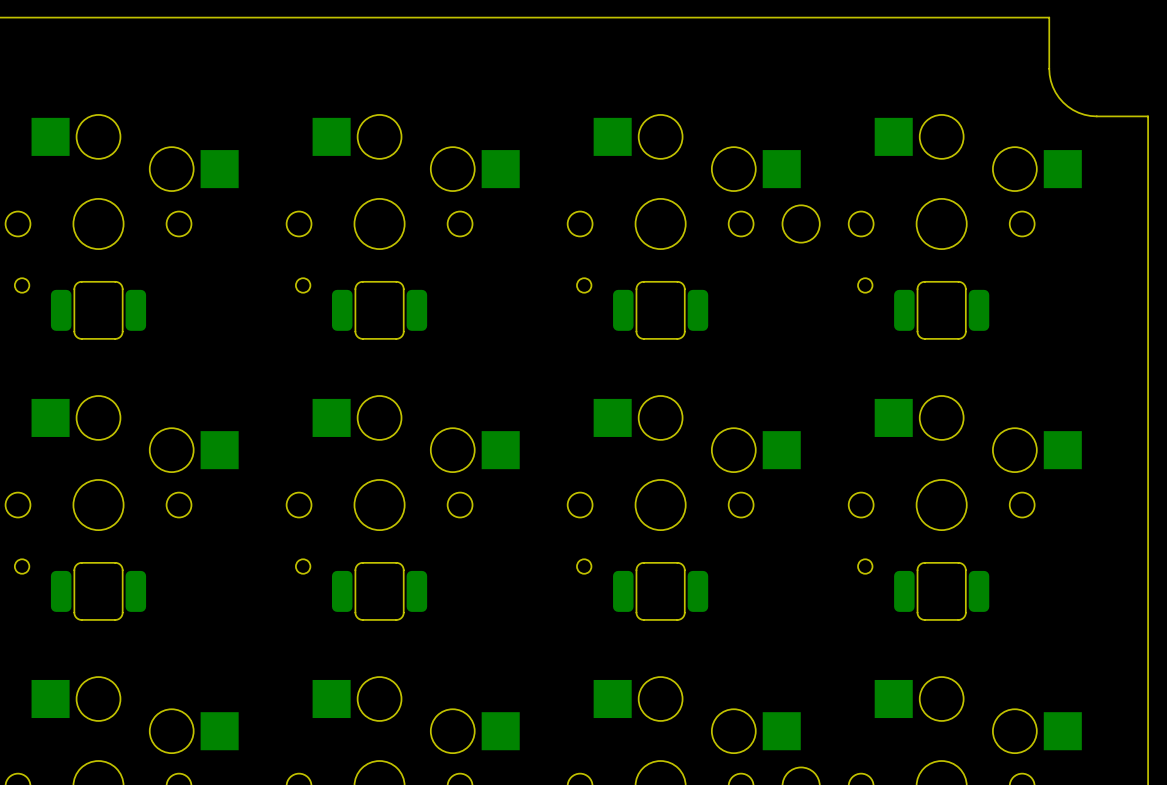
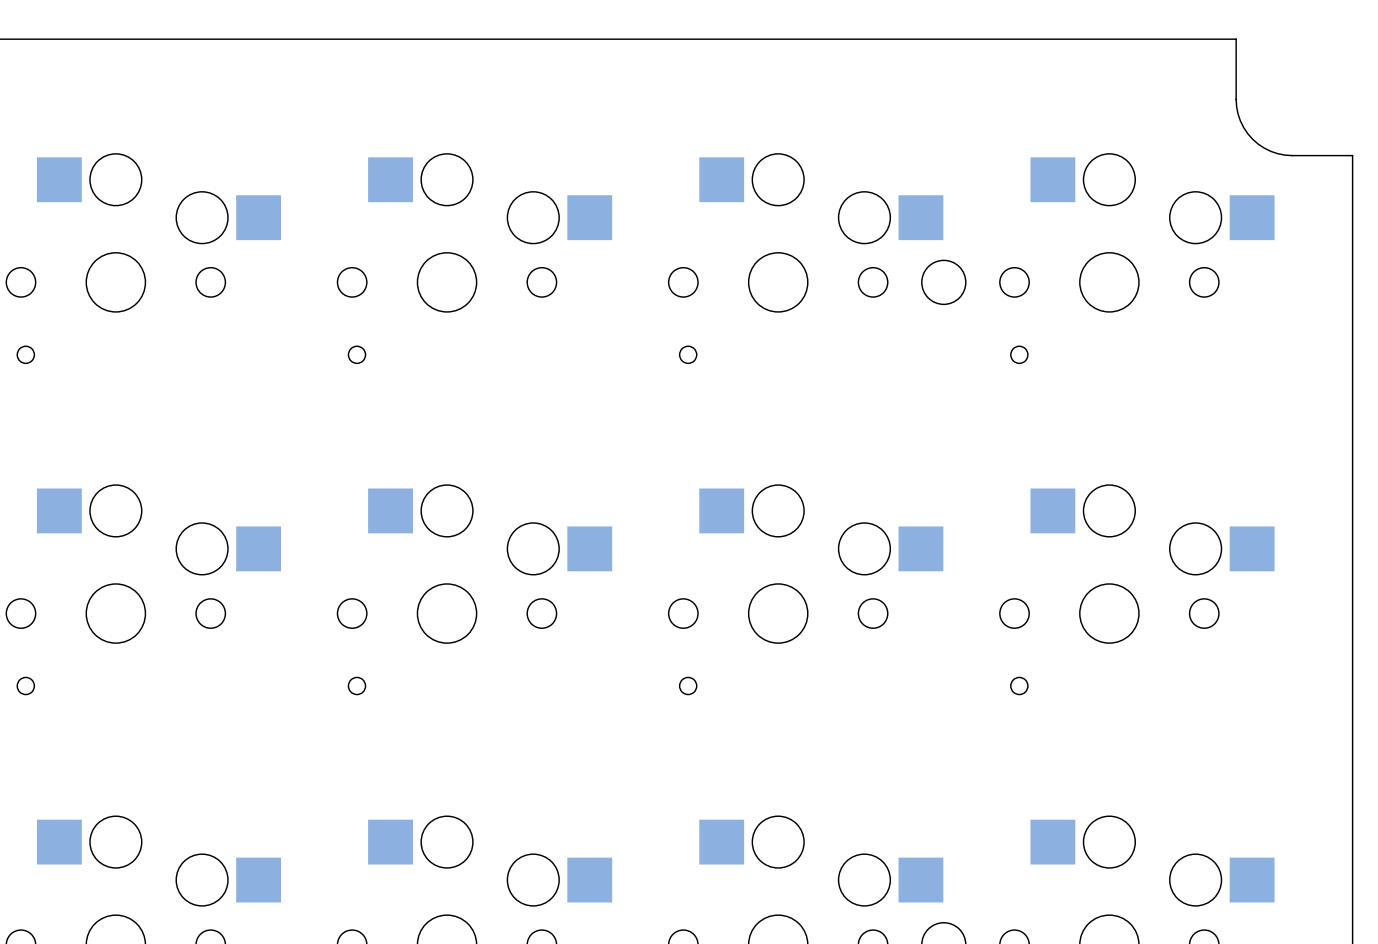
part: (98, 310) -> none
part: (379, 310) -> none
part: (660, 310) -> none
part: (941, 310) -> none
part: (98, 591) -> none
part: (379, 591) -> none
part: (660, 591) -> none
part: (941, 591) -> none

